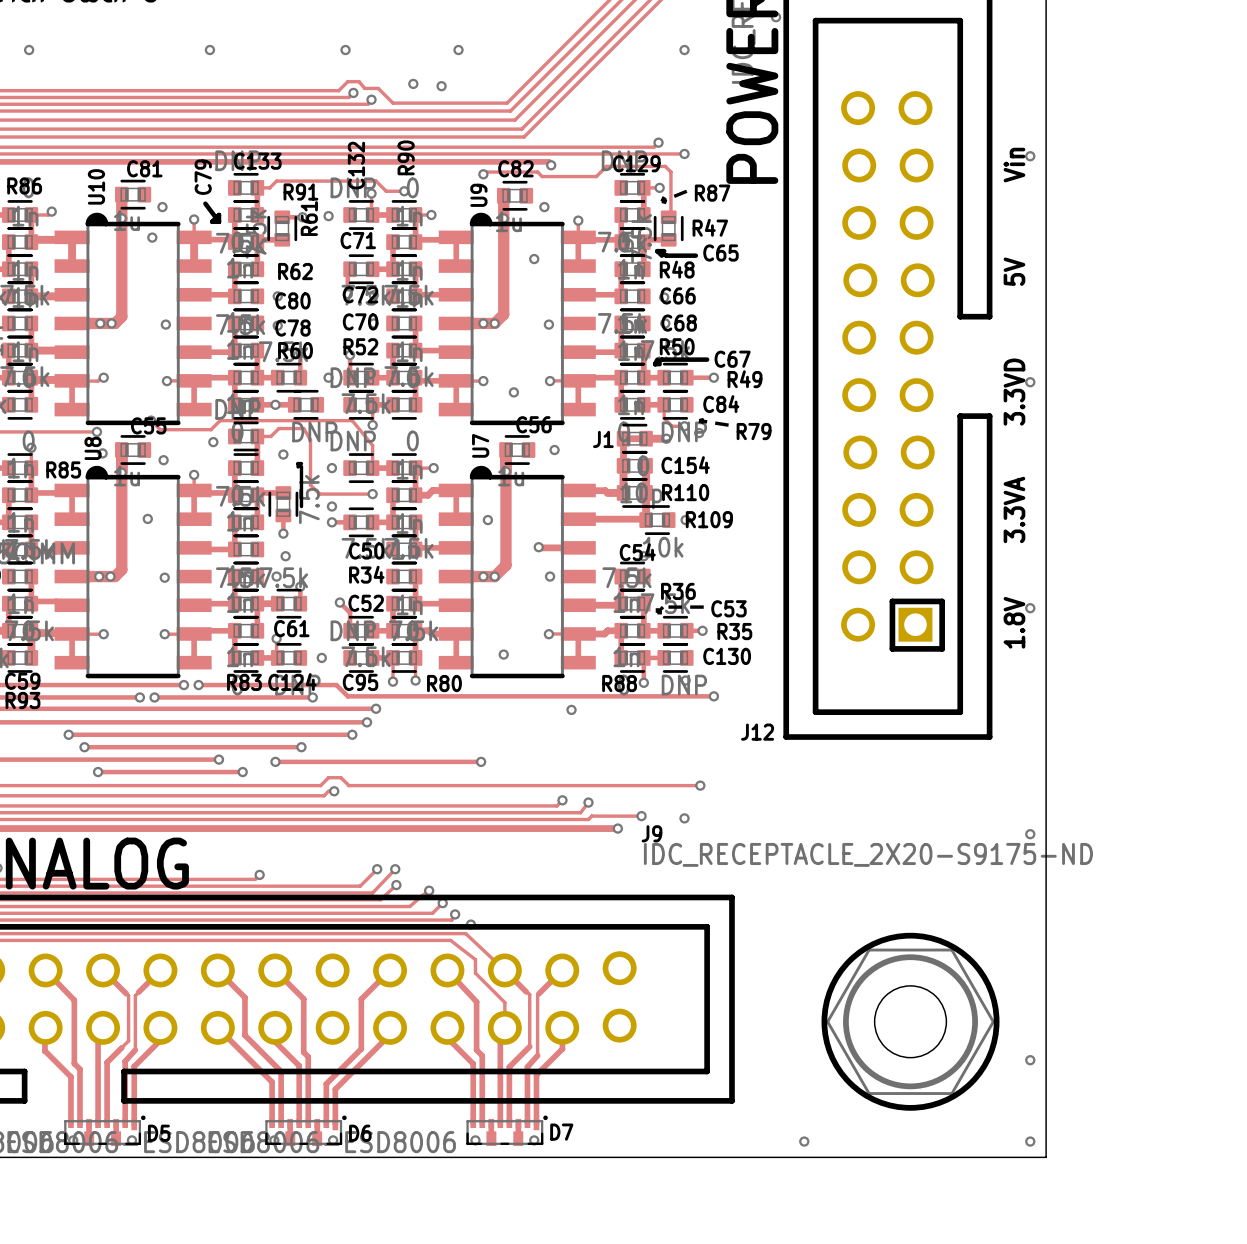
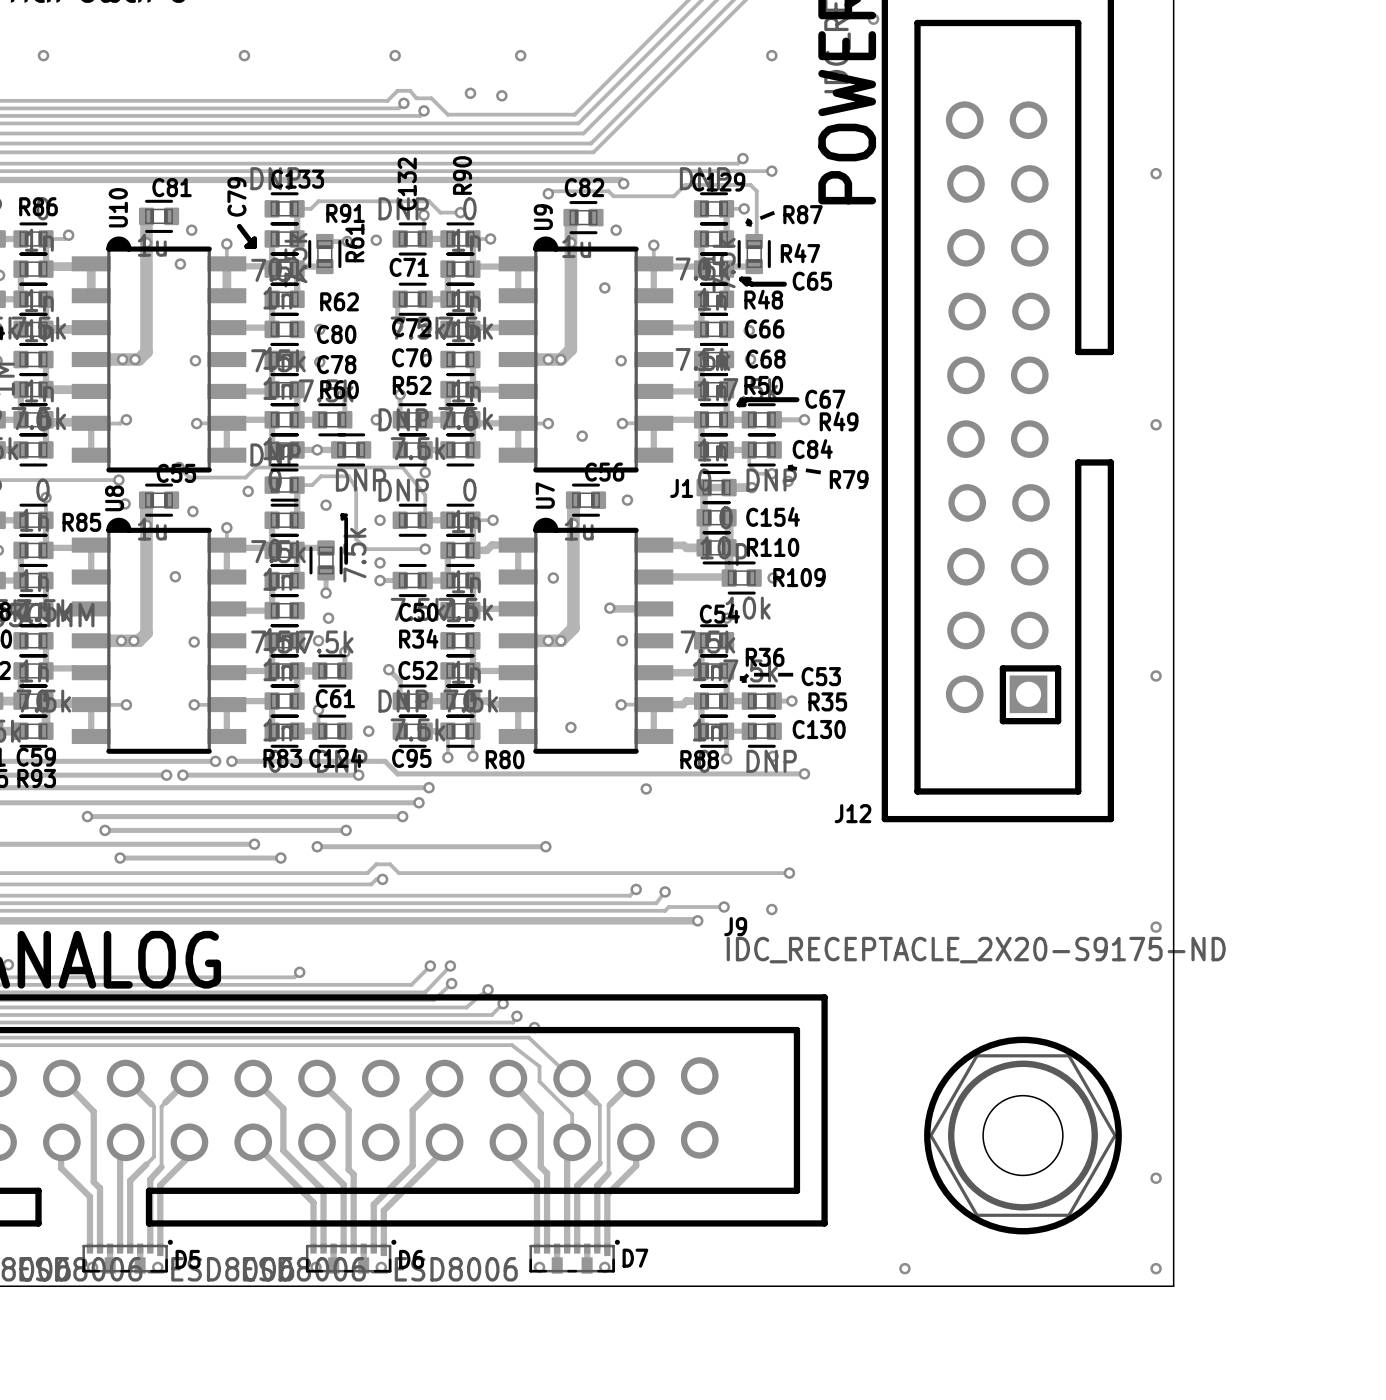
text: Vin (1014, 165) -> none
text: 5V (1014, 271) -> none
text: 3.3VD (1014, 392) -> none
text: 3.3VA (1014, 509) -> none
text: 1.8V (1014, 622) -> none

